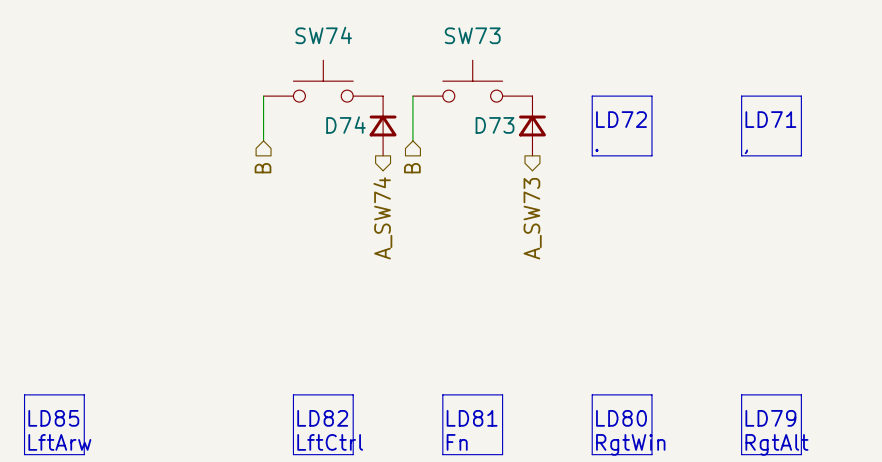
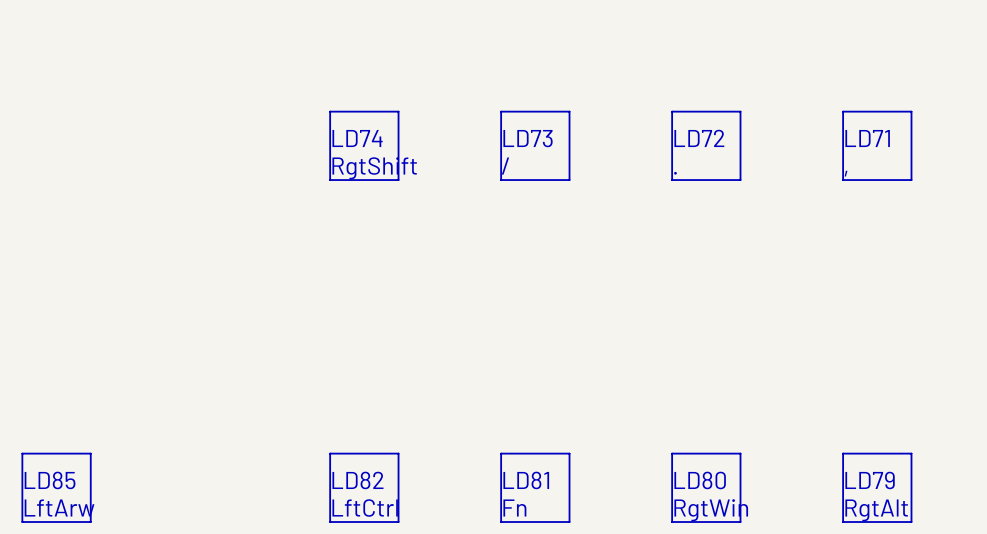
SW74: (323, 81) -> none
SW73: (472, 81) -> none
wire: (263, 96) (263, 140) -> none
line: none -> (330, 111) (398, 111) (398, 180) (330, 180) (330, 111)
wire: (412, 96) (412, 140) -> none
line: none -> (501, 111) (569, 111) (569, 180) (501, 180) (501, 111)
text: none -> LD74 (357, 138)
text: none -> LD73 (528, 138)
D74: (383, 125) -> none
D73: (532, 125) -> none
text: none -> / (505, 166)
text: none -> RgtShift (374, 168)
hierarchical label: B (263, 168) -> none
hierarchical label: B (412, 168) -> none
hierarchical label: A_SW74 (382, 218) -> none
hierarchical label: A_SW73 (532, 218) -> none

